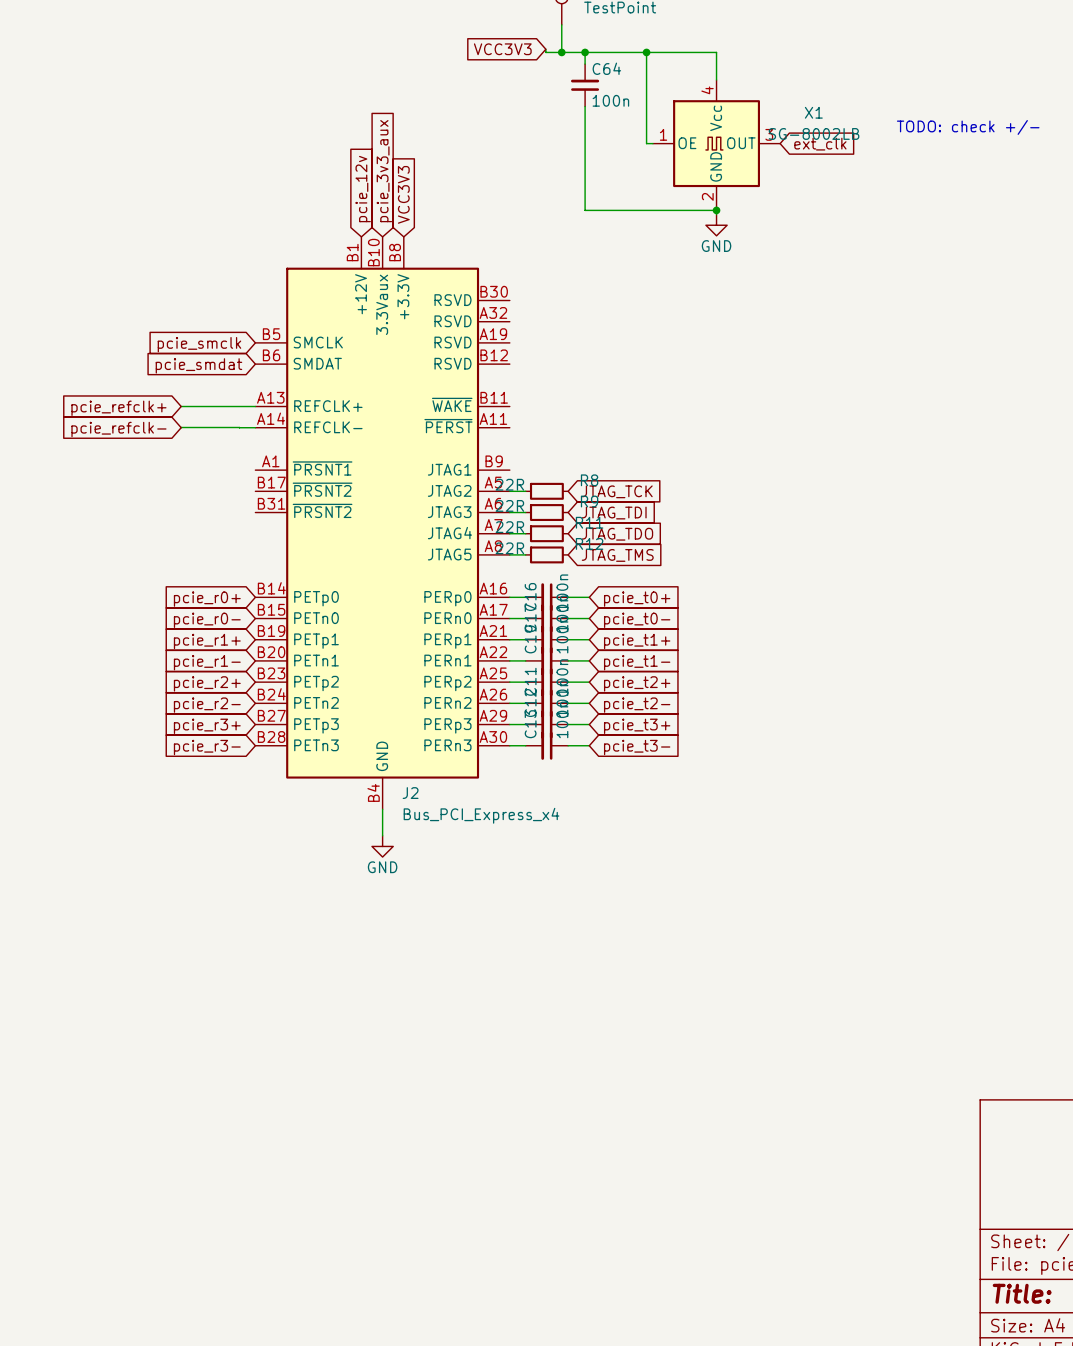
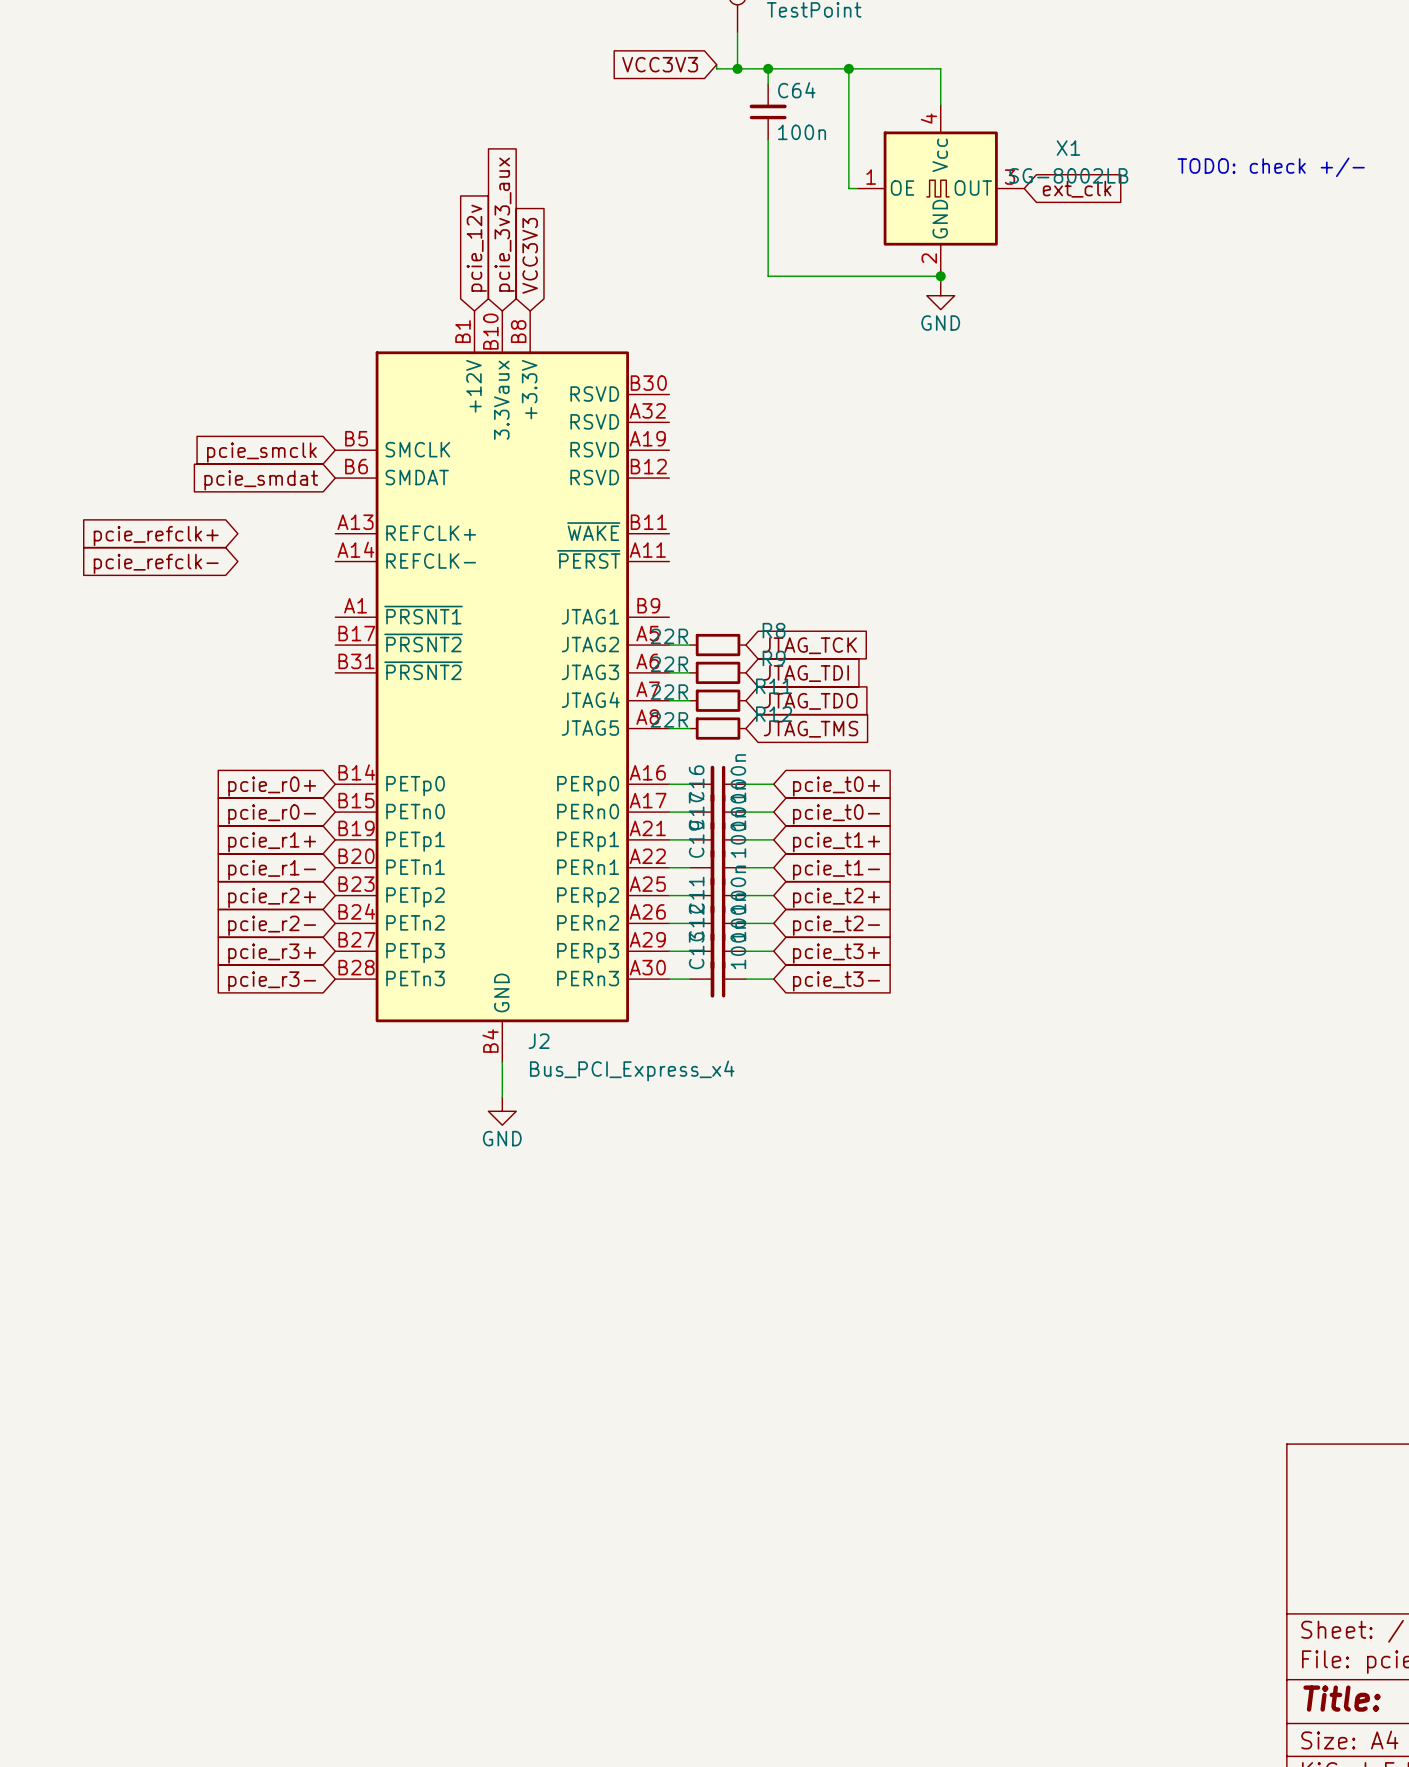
wire: (181, 406) (255, 406) -> none
wire: (181, 427) (255, 427) -> none

